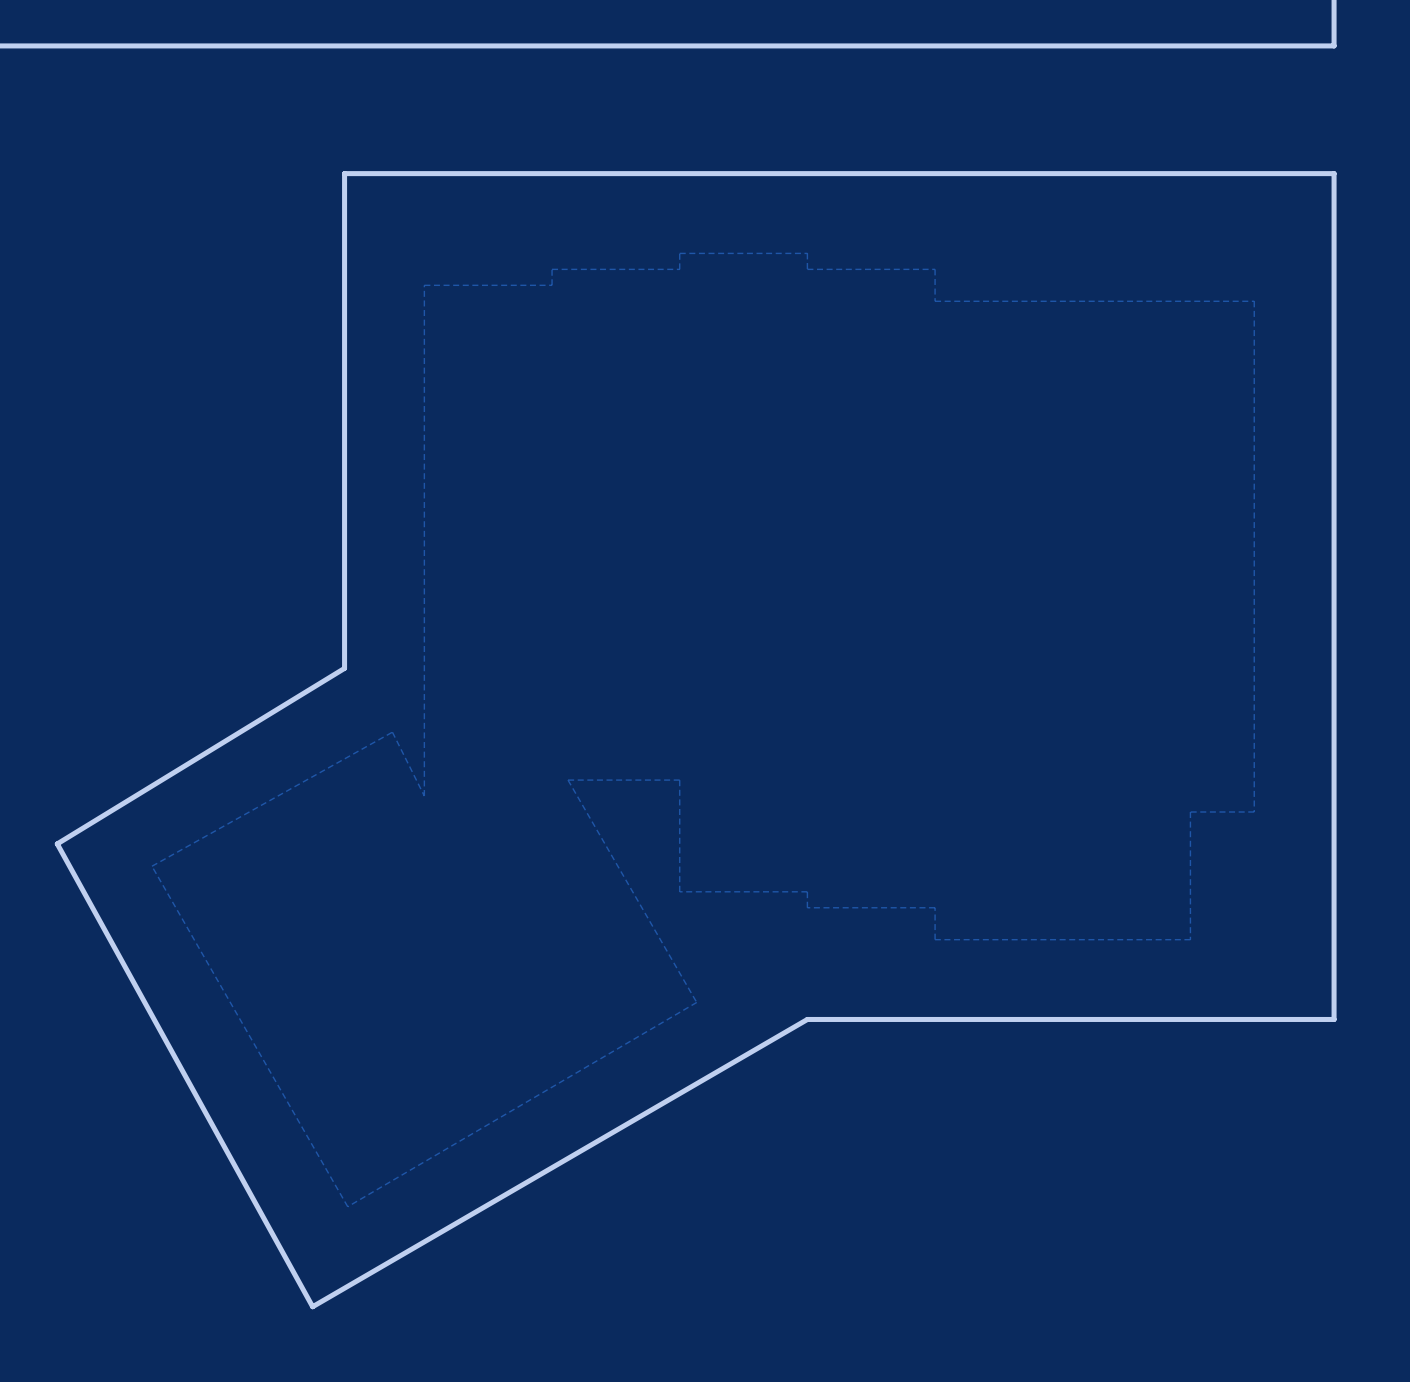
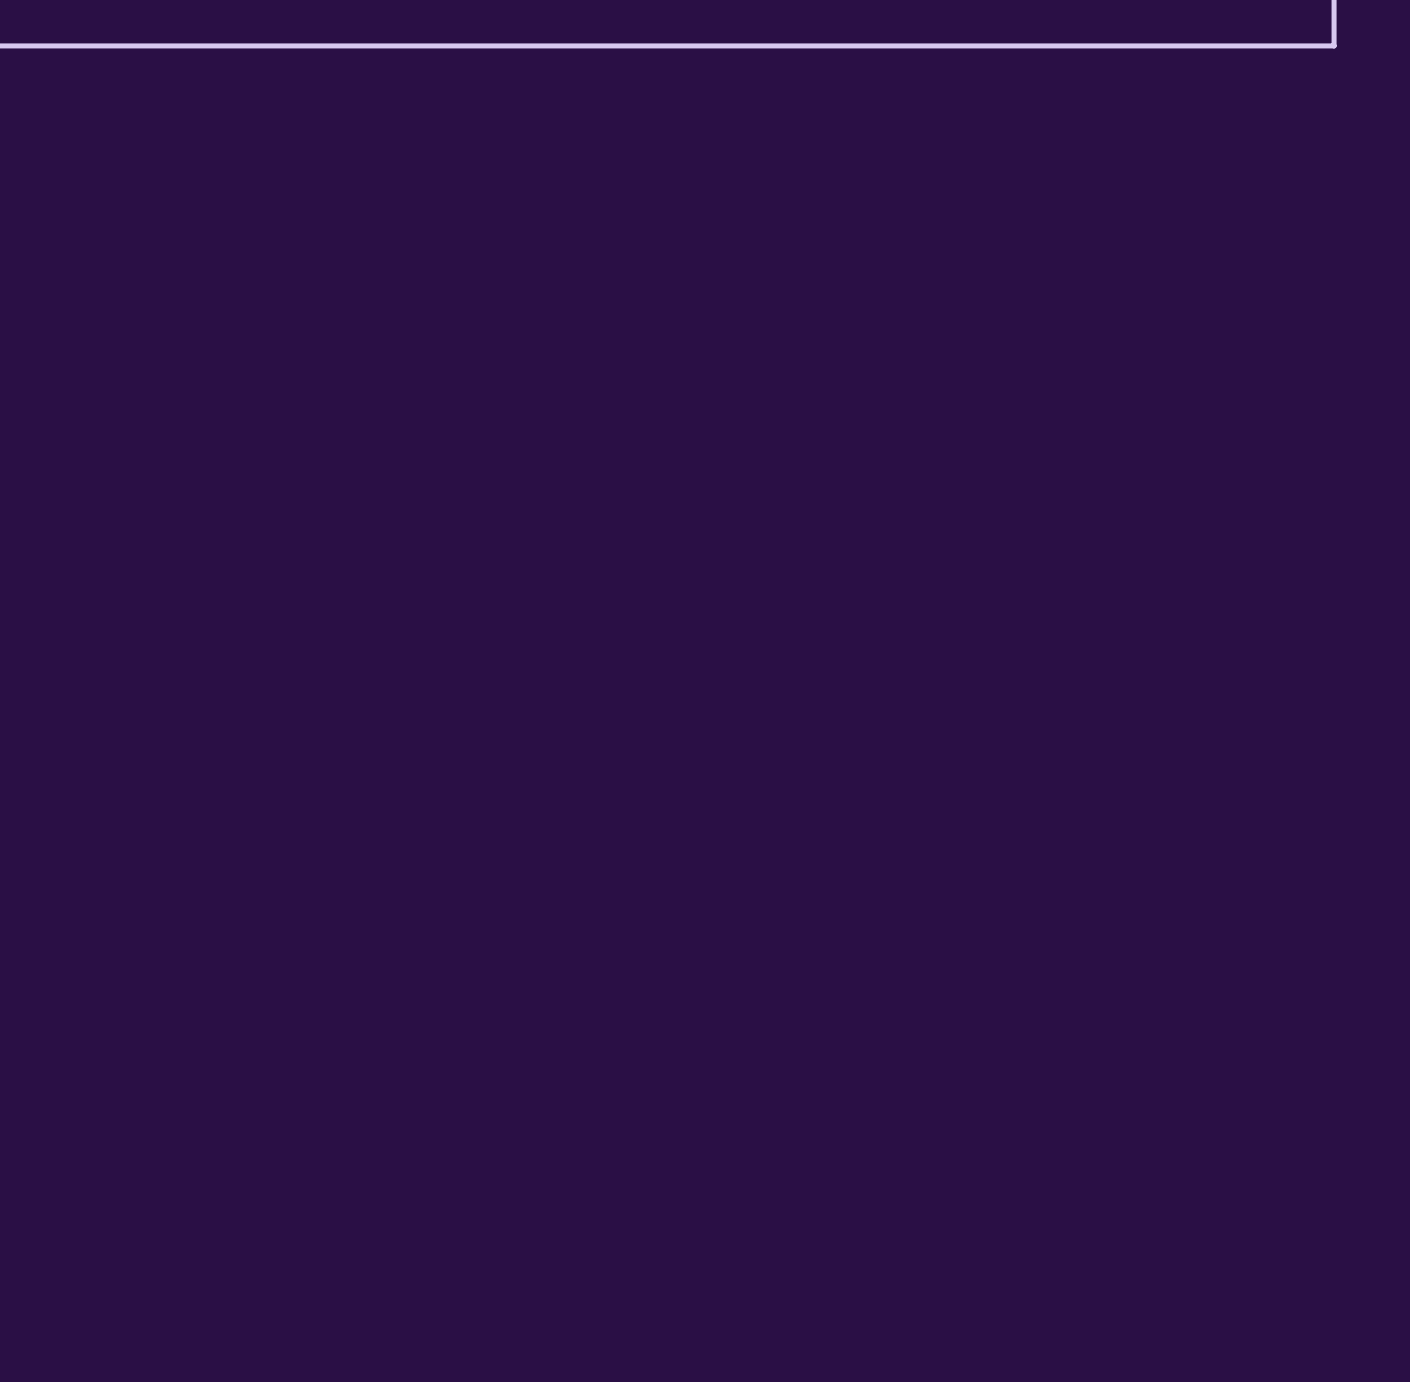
board edge: (344, 173) (1334, 173) (1334, 1019) (807, 1019) (312, 1306) (57, 843) (344, 668) (344, 173) -> none
zone outline: (679, 253) (679, 269) (552, 269) (552, 285) (424, 285) (424, 796) (392, 732) (151, 866) (347, 1206) (696, 1002) (568, 780) (679, 780) (679, 891) (807, 891) (807, 907) (935, 907) (935, 939) (1190, 939) (1190, 811) (1254, 811) (1254, 301) (935, 301) (935, 269) (807, 269) (807, 253) (679, 253) -> none

